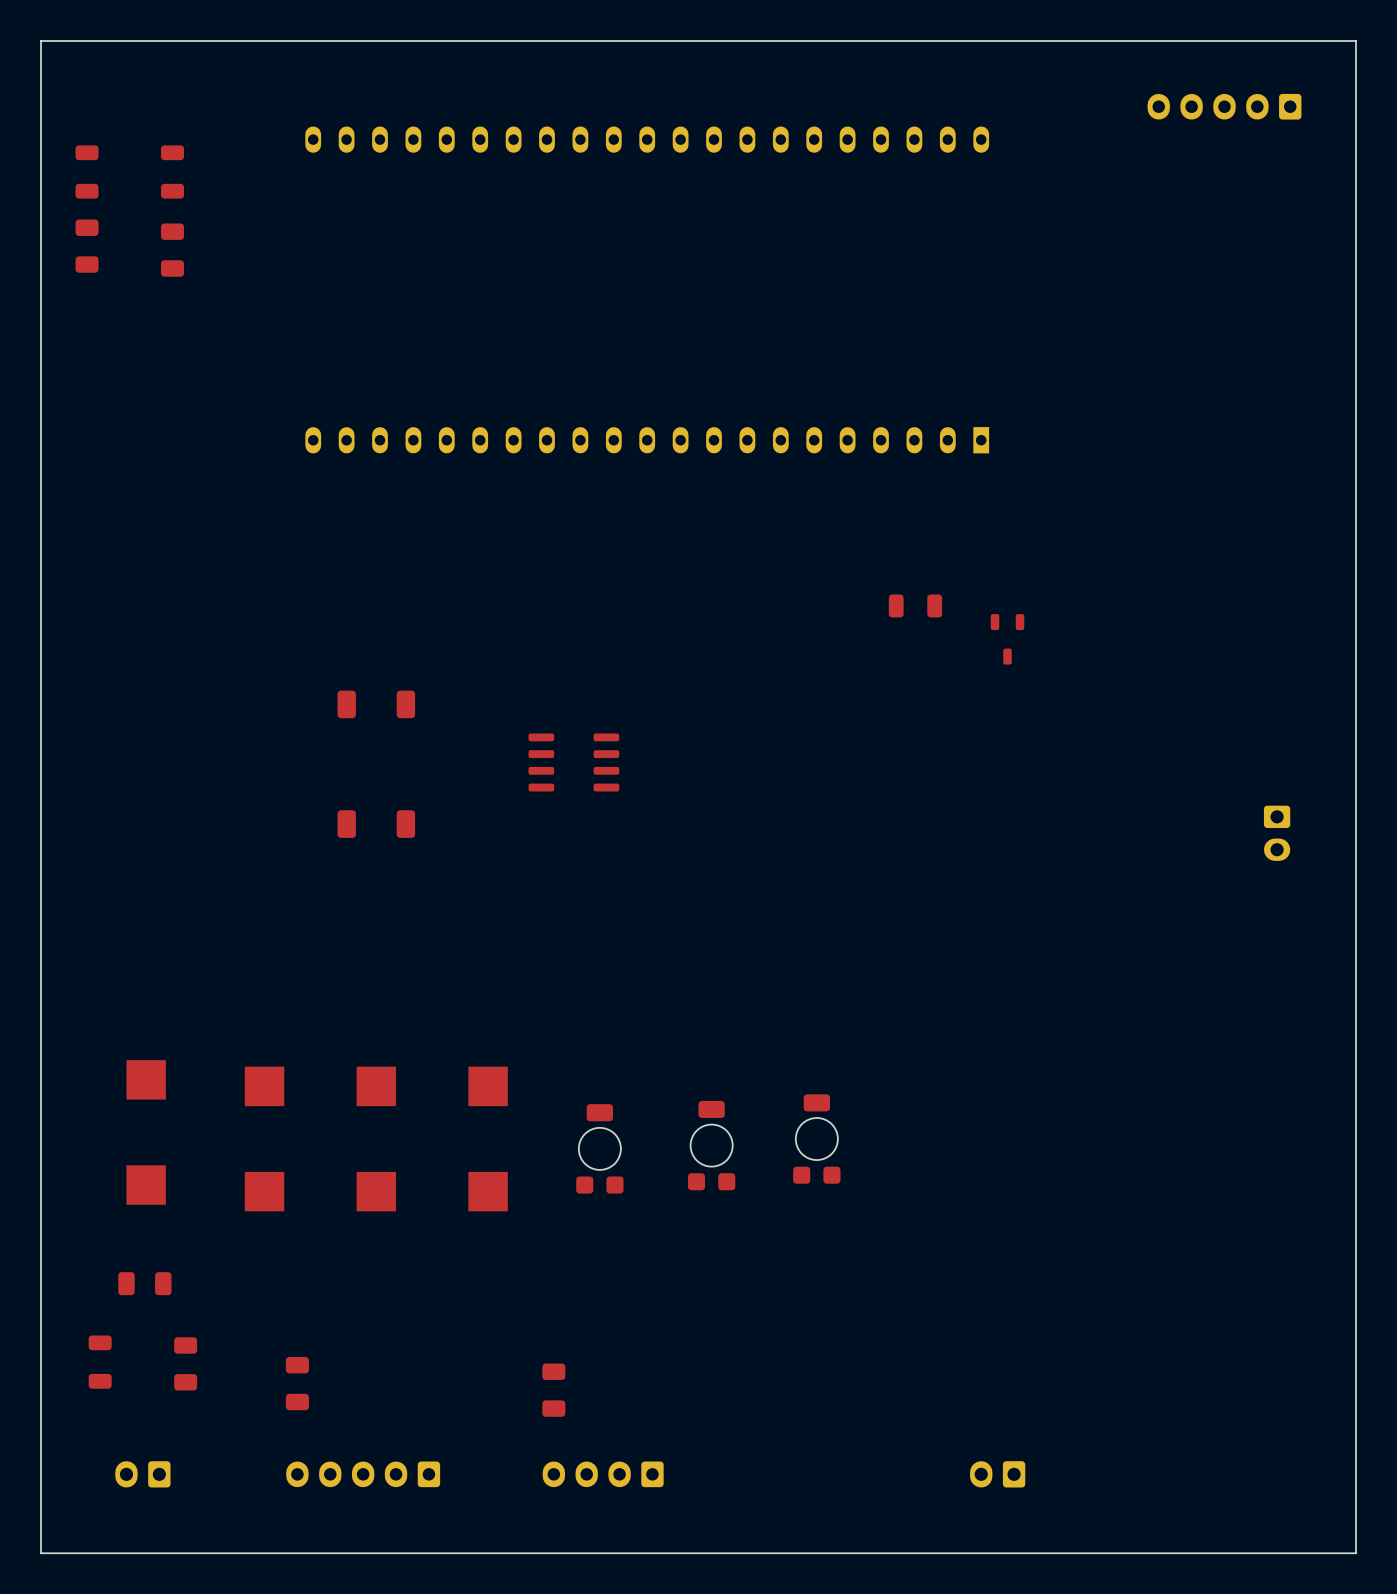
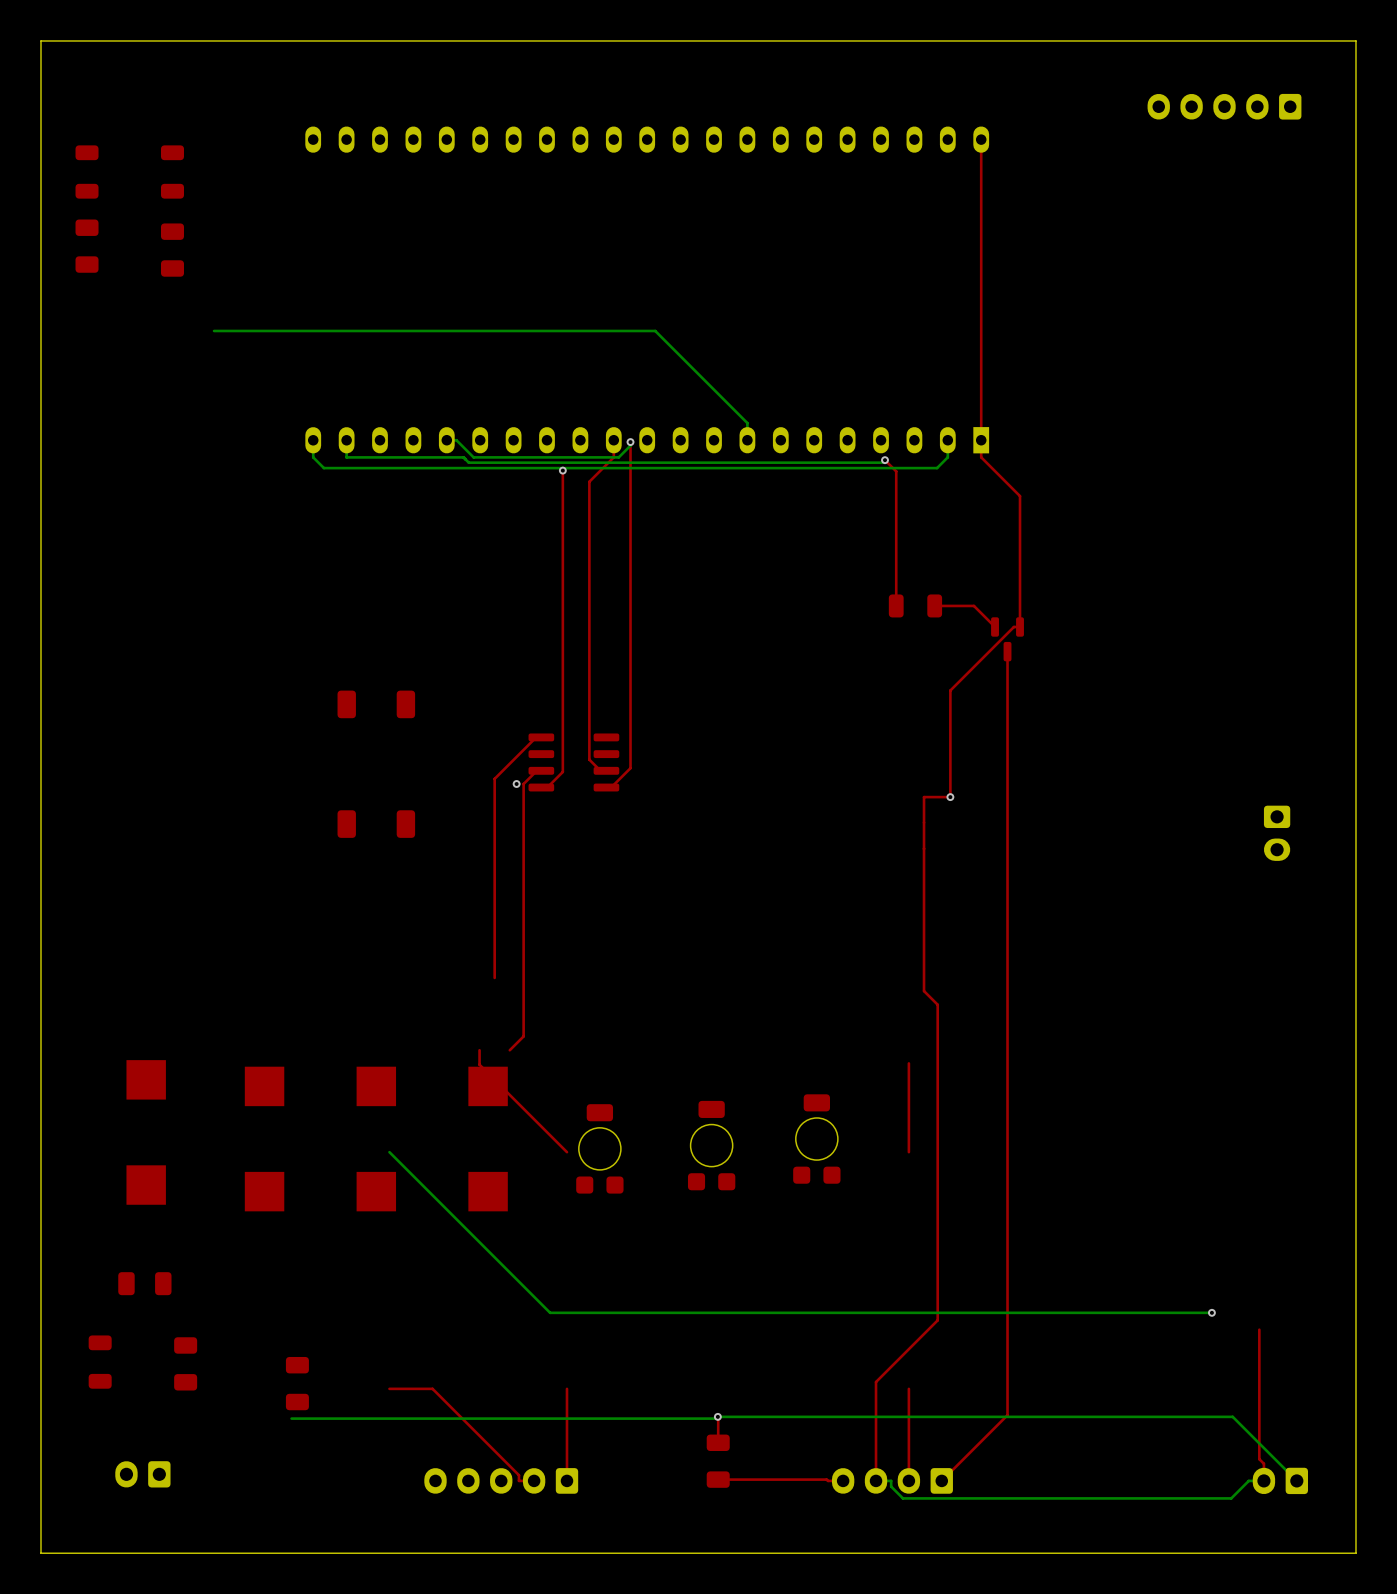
top track: none -> (981, 139) (981, 457) (1020, 496) (1020, 626) (1013, 626) (950, 690) (950, 797) (924, 797) (924, 991) (937, 1004) (937, 1320) (876, 1382) (876, 1480)
bottom track: none -> (214, 330) (655, 330) (747, 423) (747, 440)
bottom track: none -> (346, 440) (346, 457) (463, 457) (468, 462) (882, 462) (885, 460)
bottom track: none -> (446, 440) (456, 440) (473, 457) (618, 457) (630, 445) (630, 442)
top track: none -> (613, 440) (613, 457) (589, 481) (589, 759) (600, 770) (606, 770)
bottom track: none -> (947, 440) (947, 457) (937, 468) (323, 468) (313, 457) (313, 440)
top track: none -> (630, 442) (630, 768) (611, 787) (606, 787)
via: none -> (630, 442)
top track: none -> (885, 460) (896, 471) (896, 605)
via: none -> (885, 460)
top track: none -> (562, 470) (562, 771) (547, 787) (541, 787)
via: none -> (562, 470)
top track: none -> (934, 605) (973, 605) (995, 626)
part footprint: [990, 614, 1025, 665] -> [991, 617, 1024, 662]
top track: none -> (1007, 651) (1007, 1415) (941, 1480)
top track: none -> (541, 737) (536, 737) (494, 778) (494, 977)
top track: none -> (541, 770) (536, 770) (523, 783) (523, 1036) (509, 1050)
via: none -> (516, 783)
via: none -> (950, 797)
top track: none -> (479, 1050) (479, 1064) (566, 1152)
top track: none -> (908, 1063) (908, 1152)
bottom track: none -> (389, 1152) (550, 1312) (1211, 1312)
via: none -> (1211, 1312)
top track: none -> (1259, 1329) (1259, 1459) (1263, 1463) (1263, 1480)
top track: none -> (389, 1388) (432, 1388) (518, 1475) (518, 1480) (534, 1480)
top track: none -> (566, 1388) (566, 1480)
top track: none -> (908, 1388) (908, 1480)
part position: (553, 1390) -> (718, 1461)
top track: none -> (717, 1416) (718, 1442)
via: none -> (717, 1416)
bottom track: none -> (291, 1418) (1232, 1416) (1296, 1480)
part position: (363, 1474) -> (501, 1480)
part position: (603, 1474) -> (892, 1480)
part position: (997, 1474) -> (1280, 1480)
top track: none -> (718, 1479) (843, 1480)
bottom track: none -> (1263, 1480) (1248, 1480) (1231, 1498) (902, 1498) (891, 1486) (891, 1480) (876, 1480)

